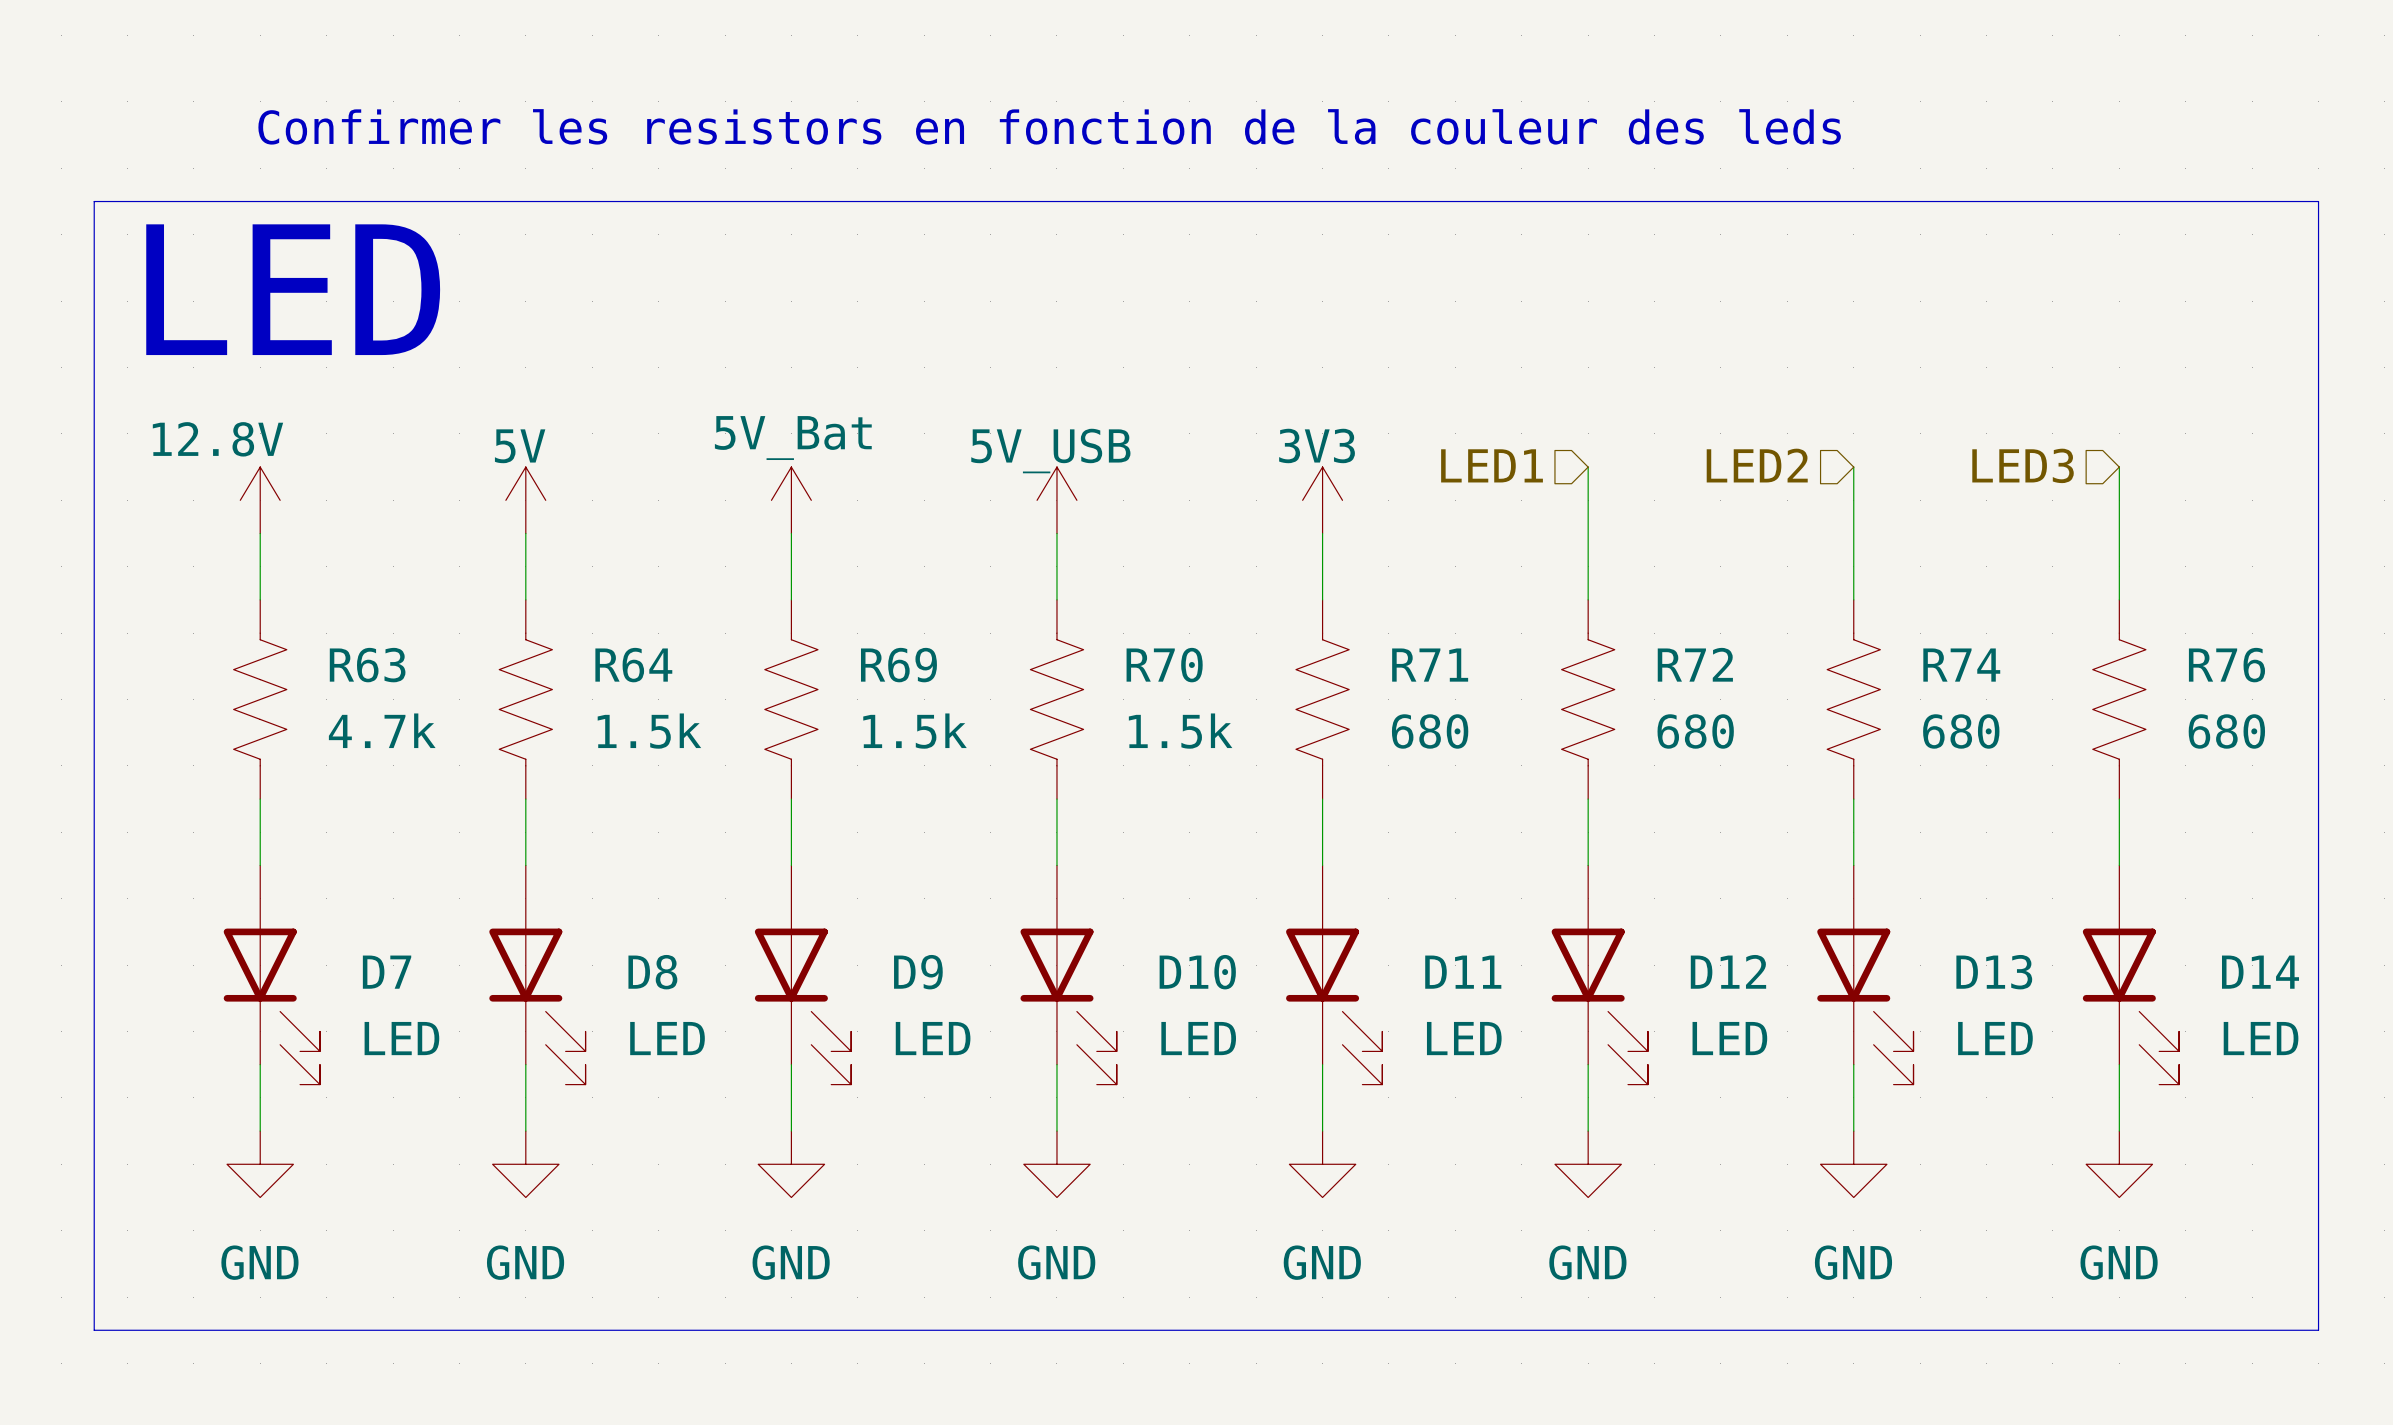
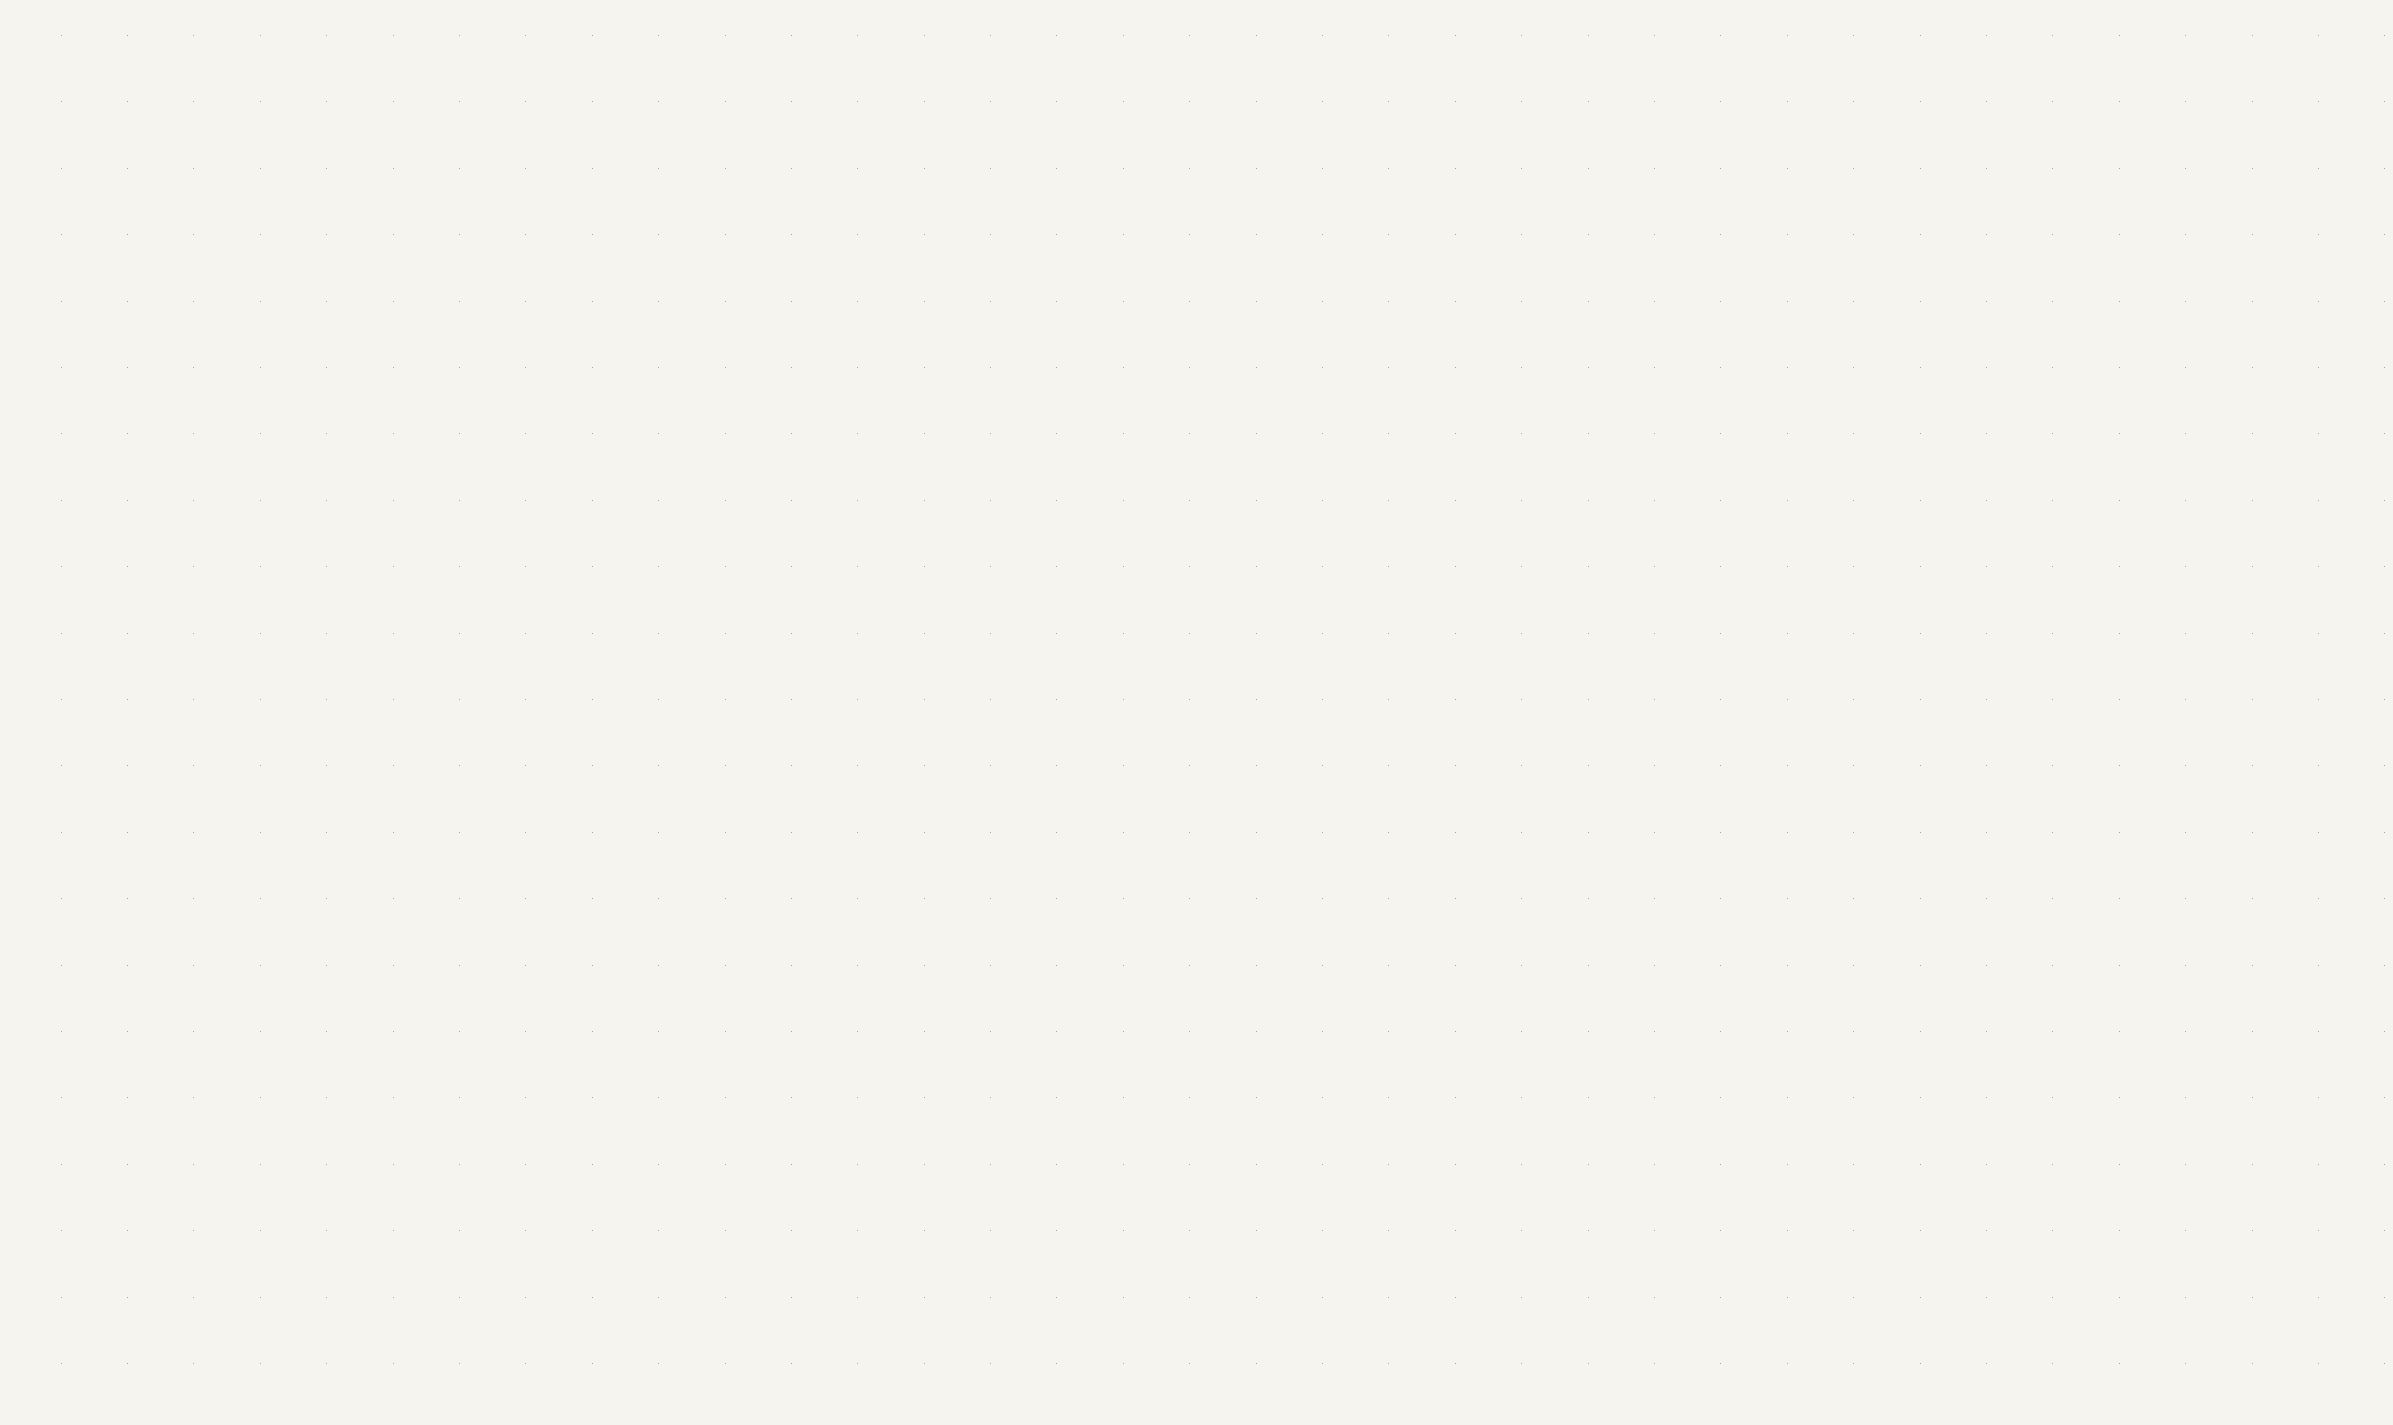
text: Confirmer les resistors en fonction de la couleur des leds (1049, 126) -> none
line: (94, 201) (2318, 201) (2318, 1330) (94, 1330) (94, 201) -> none
text: LED (293, 289) -> none
hierarchical label: LED1 (1492, 465) -> none
hierarchical label: LED2 (1757, 465) -> none
hierarchical label: LED3 (2023, 465) -> none
wire: (1588, 467) (1588, 599) -> none
wire: (1853, 467) (1853, 599) -> none
wire: (2119, 467) (2119, 599) -> none
power symbol: 12.8V (260, 500) -> none
power symbol: 5V (525, 500) -> none
power symbol: 5V_Bat (791, 500) -> none
power symbol: 5V_USB (1056, 500) -> none
power symbol: 3V3 (1322, 500) -> none
wire: (260, 533) (260, 599) -> none
wire: (525, 533) (525, 599) -> none
wire: (791, 533) (791, 599) -> none
wire: (1056, 533) (1056, 599) -> none
wire: (1322, 533) (1322, 599) -> none
R63: 4.7k (260, 699) -> none
R64: 1.5k (525, 699) -> none
R69: 1.5k (791, 699) -> none
R70: 1.5k (1056, 699) -> none
R71: 680 (1322, 699) -> none
R72: 680 (1588, 699) -> none
R74: 680 (1853, 699) -> none
R76: 680 (2119, 699) -> none
wire: (260, 799) (260, 865) -> none
wire: (525, 799) (525, 865) -> none
wire: (791, 799) (791, 865) -> none
wire: (1056, 799) (1056, 865) -> none
wire: (1322, 799) (1322, 865) -> none
wire: (1588, 799) (1588, 865) -> none
wire: (1853, 799) (1853, 865) -> none
wire: (2119, 799) (2119, 865) -> none
D7: LED (271, 975) -> none
D8: LED (537, 975) -> none
D9: LED (803, 975) -> none
D10: LED (1068, 975) -> none
D11: LED (1334, 975) -> none
D12: LED (1599, 975) -> none
D13: LED (1865, 975) -> none
D14: LED (2130, 975) -> none
wire: (260, 1064) (260, 1131) -> none
wire: (525, 1064) (525, 1131) -> none
wire: (791, 1064) (791, 1131) -> none
wire: (1056, 1064) (1056, 1131) -> none
wire: (1322, 1064) (1322, 1131) -> none
wire: (1588, 1064) (1588, 1131) -> none
wire: (1853, 1064) (1853, 1131) -> none
wire: (2119, 1064) (2119, 1131) -> none
power symbol: GND (260, 1164) -> none
power symbol: GND (525, 1164) -> none
power symbol: GND (791, 1164) -> none
power symbol: GND (1056, 1164) -> none
power symbol: GND (1322, 1164) -> none
power symbol: GND (1588, 1164) -> none
power symbol: GND (1853, 1164) -> none
power symbol: GND (2119, 1164) -> none

